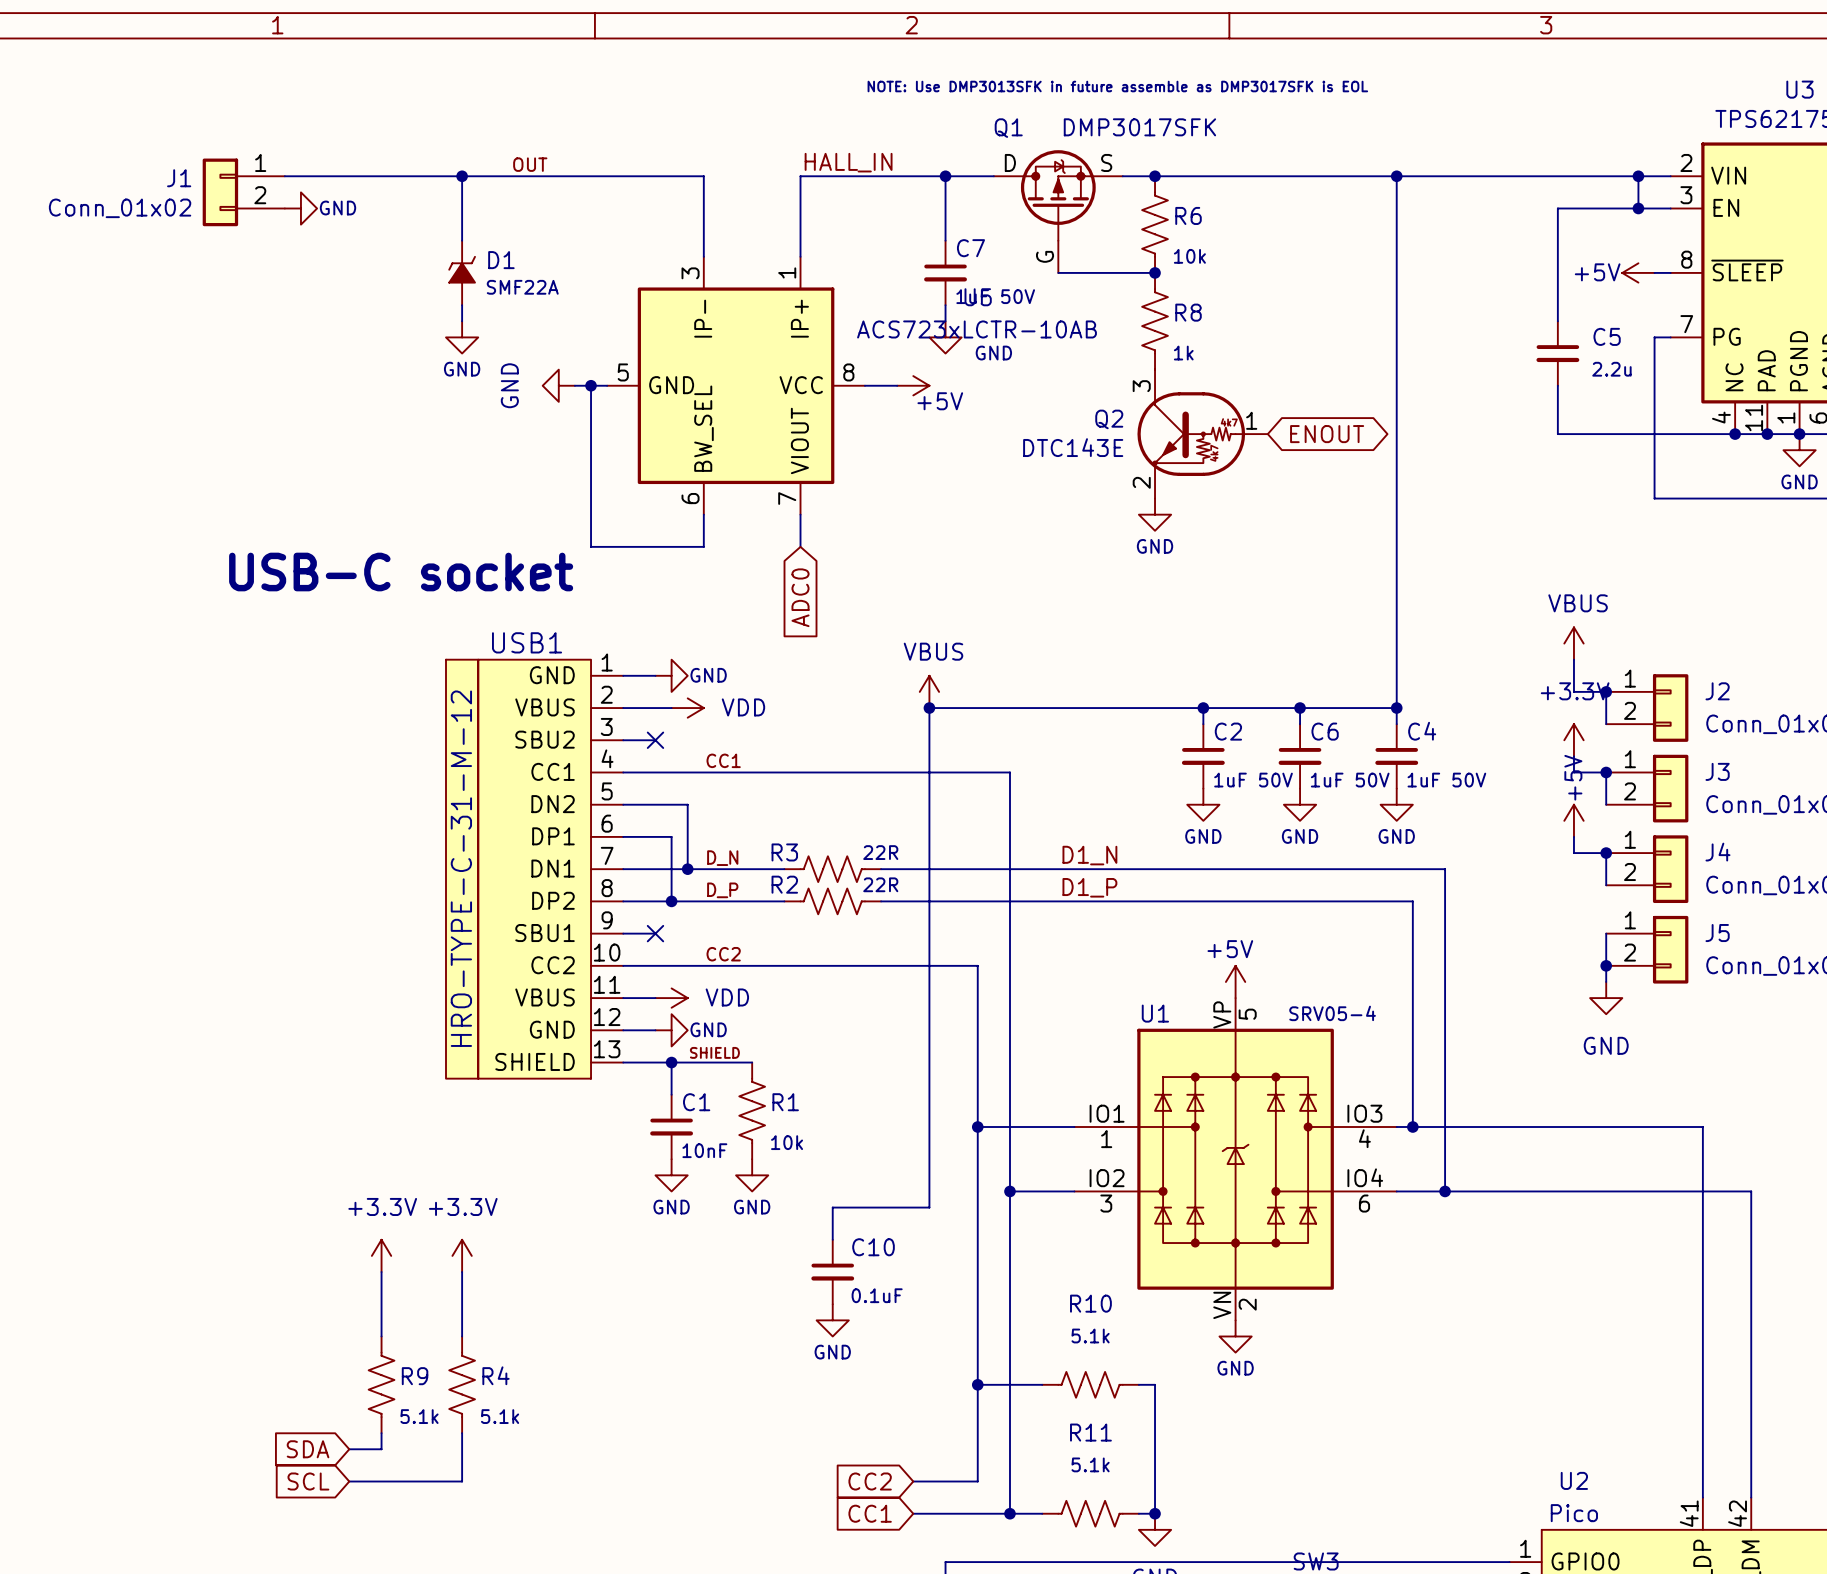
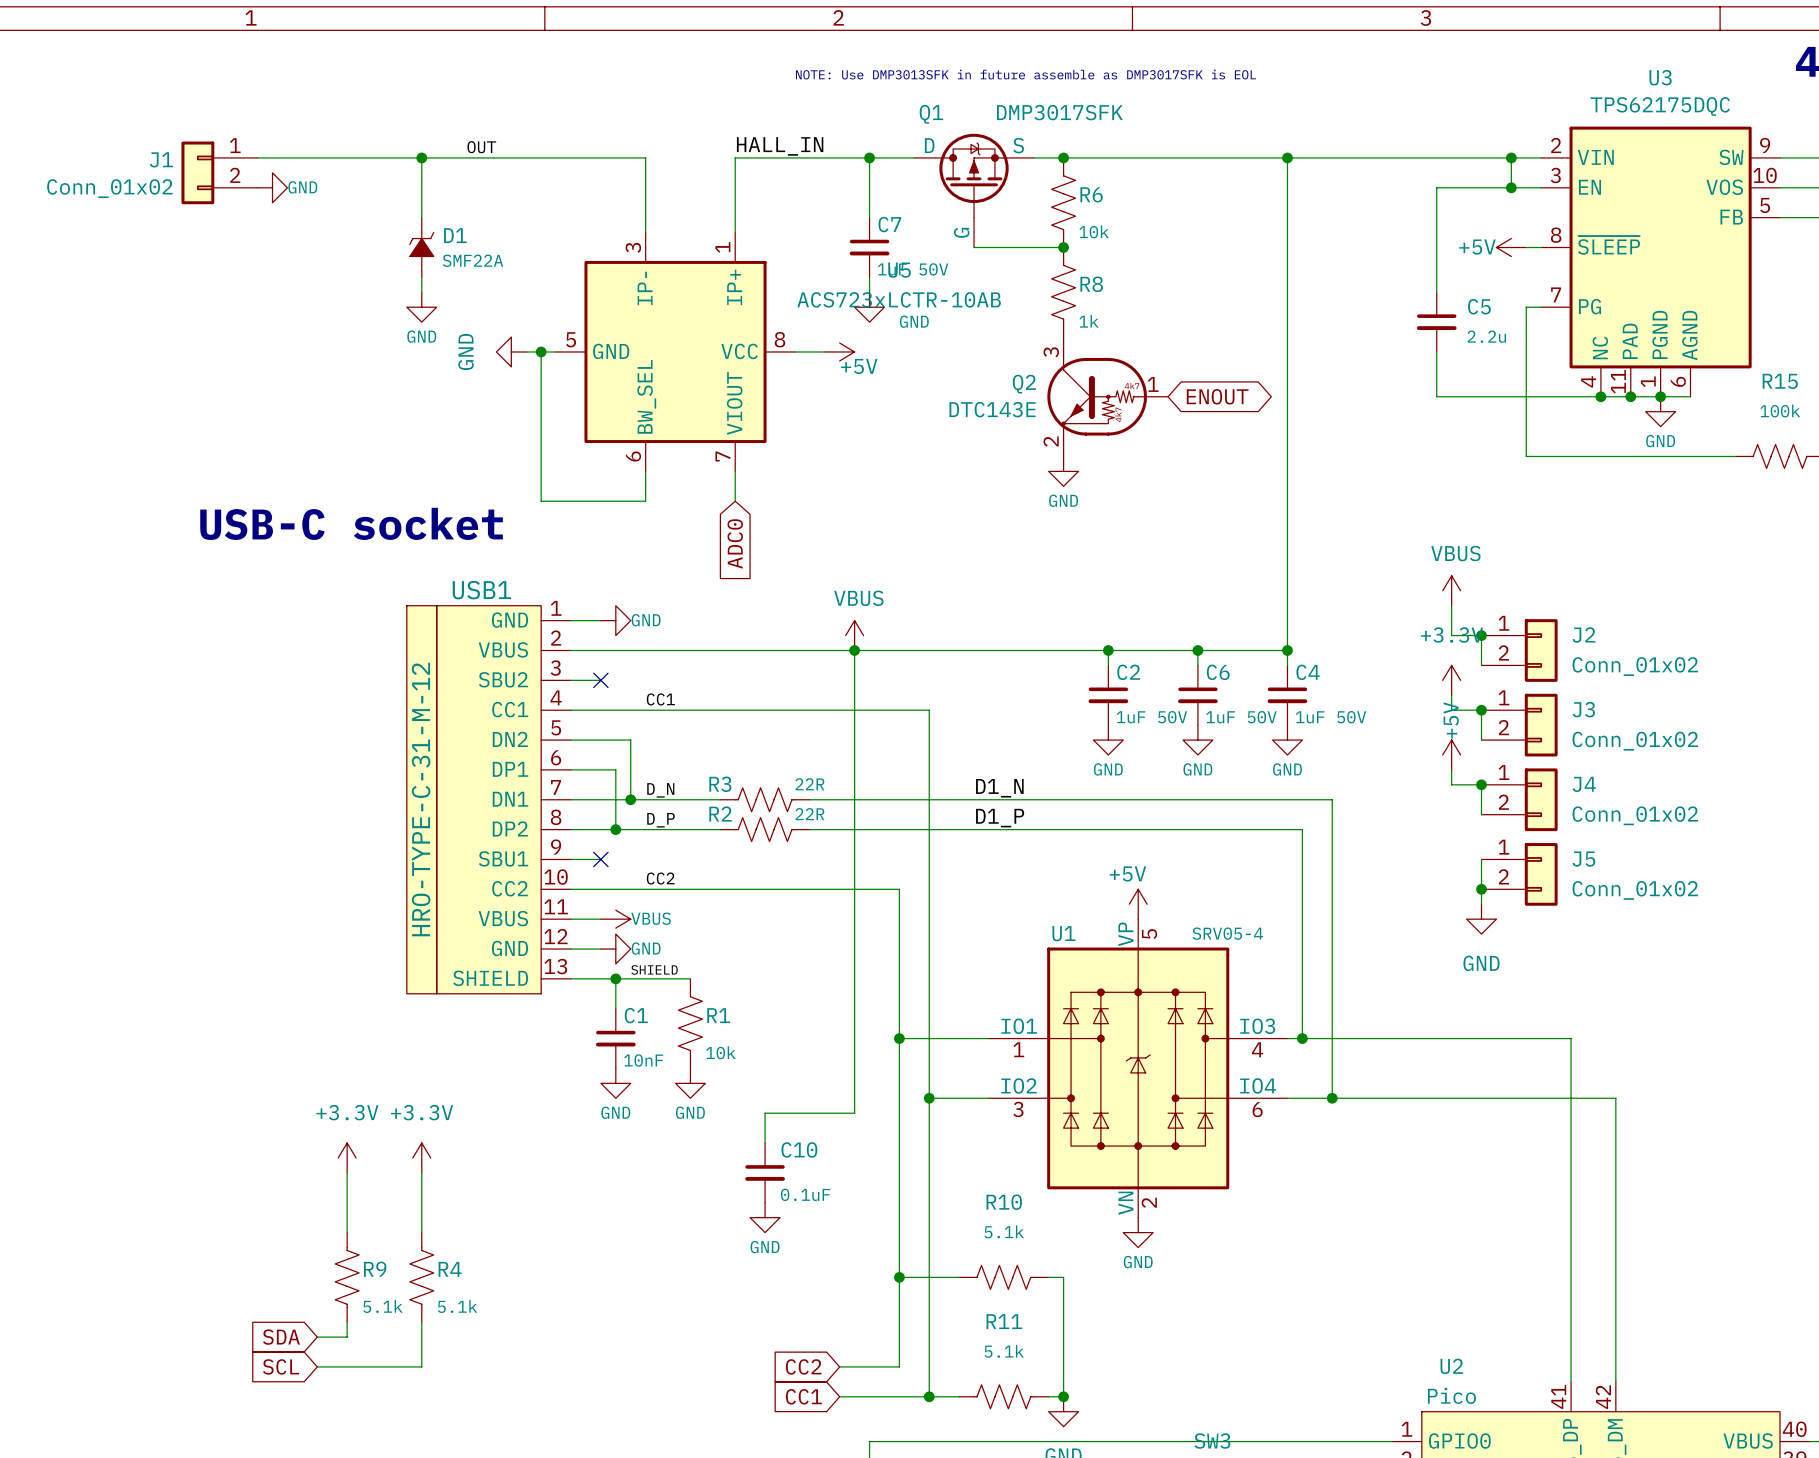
wire: none -> (615, 650) (854, 650)
power symbol: VDD (687, 708) -> none
power symbol: VDD (671, 998) -> VBUS (615, 919)

